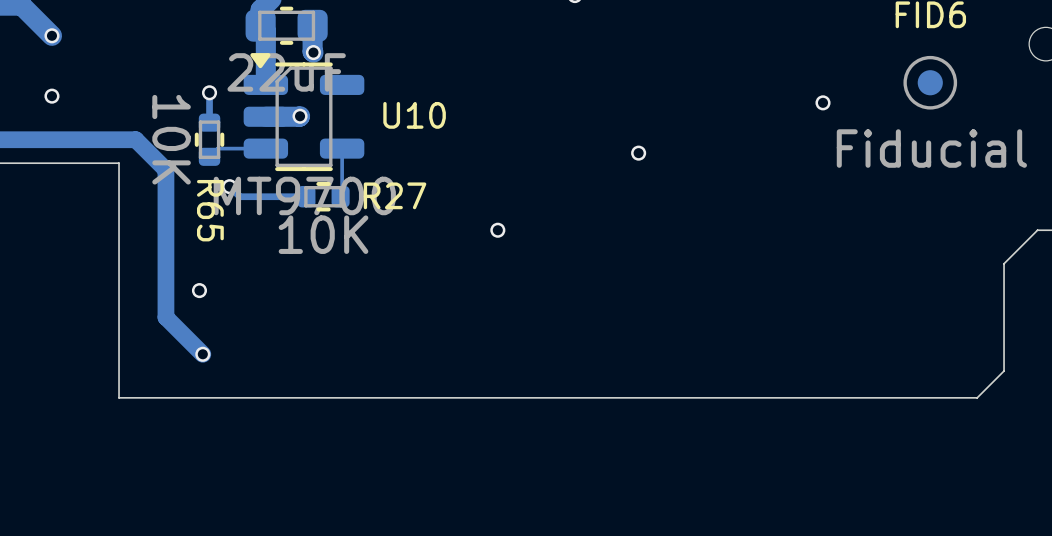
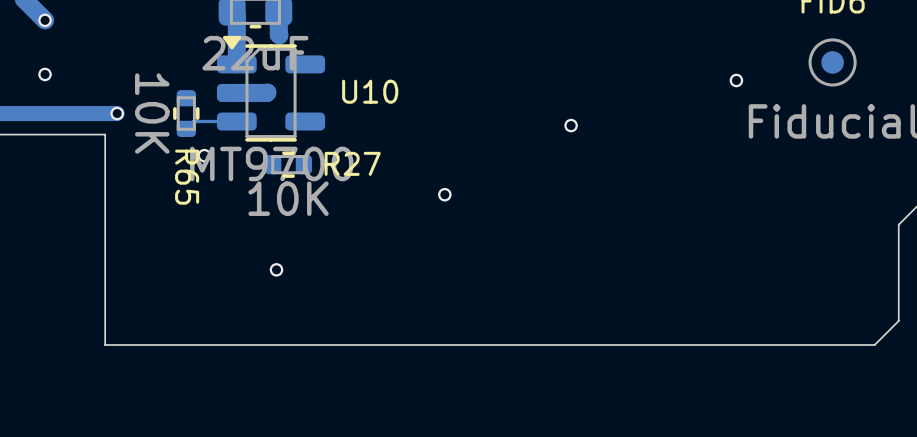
via: (313, 52) -> none
track: (209, 92) (209, 122) -> none
via: (209, 92) -> none
via: (300, 116) -> none
track: (132, 139) (135, 139) (165, 169) (165, 317) (202, 354) -> none
via: none -> (117, 113)
track: (342, 148) (340, 196) -> none
track: (229, 186) (239, 196) (306, 196) -> none
via: (199, 290) -> none
via: none -> (276, 269)
via: (202, 354) -> none

